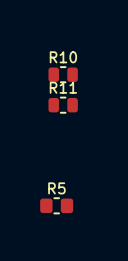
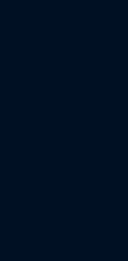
R10: (63, 74) -> none
R11: (63, 105) -> none
R5: (56, 205) -> none

